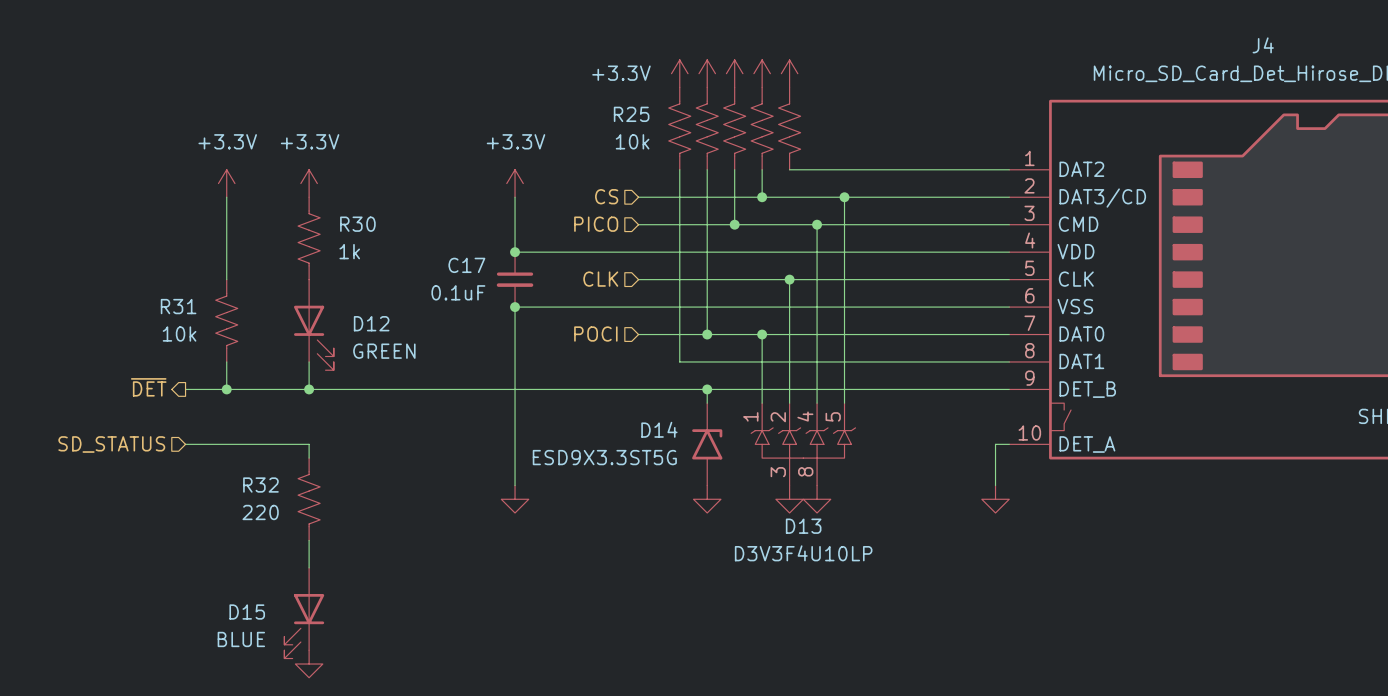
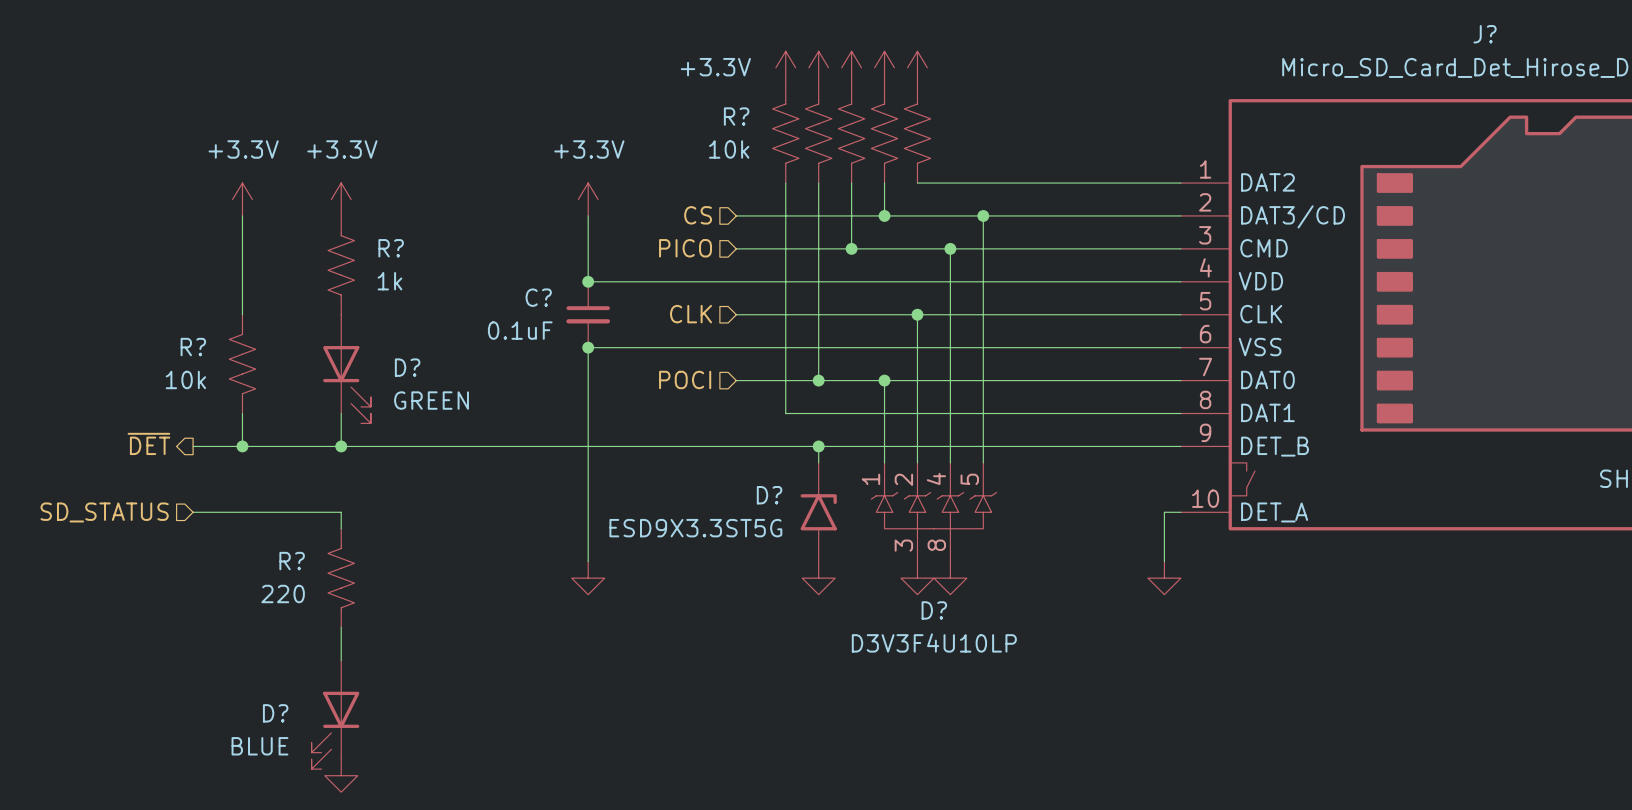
J4 name: J4 (1263, 45) -> J? (1485, 34)
R25 name: R25 (631, 114) -> R? (736, 116)
R30 name: R30 (357, 224) -> R? (391, 248)
C17 name: C17 (466, 265) -> C? (538, 297)
R31 name: R31 (178, 306) -> R? (193, 347)
D12 name: D12 (371, 323) -> D? (407, 367)
D14 name: D14 (659, 429) -> D? (769, 495)
R32 name: R32 (260, 485) -> R? (292, 561)
D13 name: D13 (803, 526) -> D? (934, 610)
D15 name: D15 (247, 612) -> D? (275, 713)

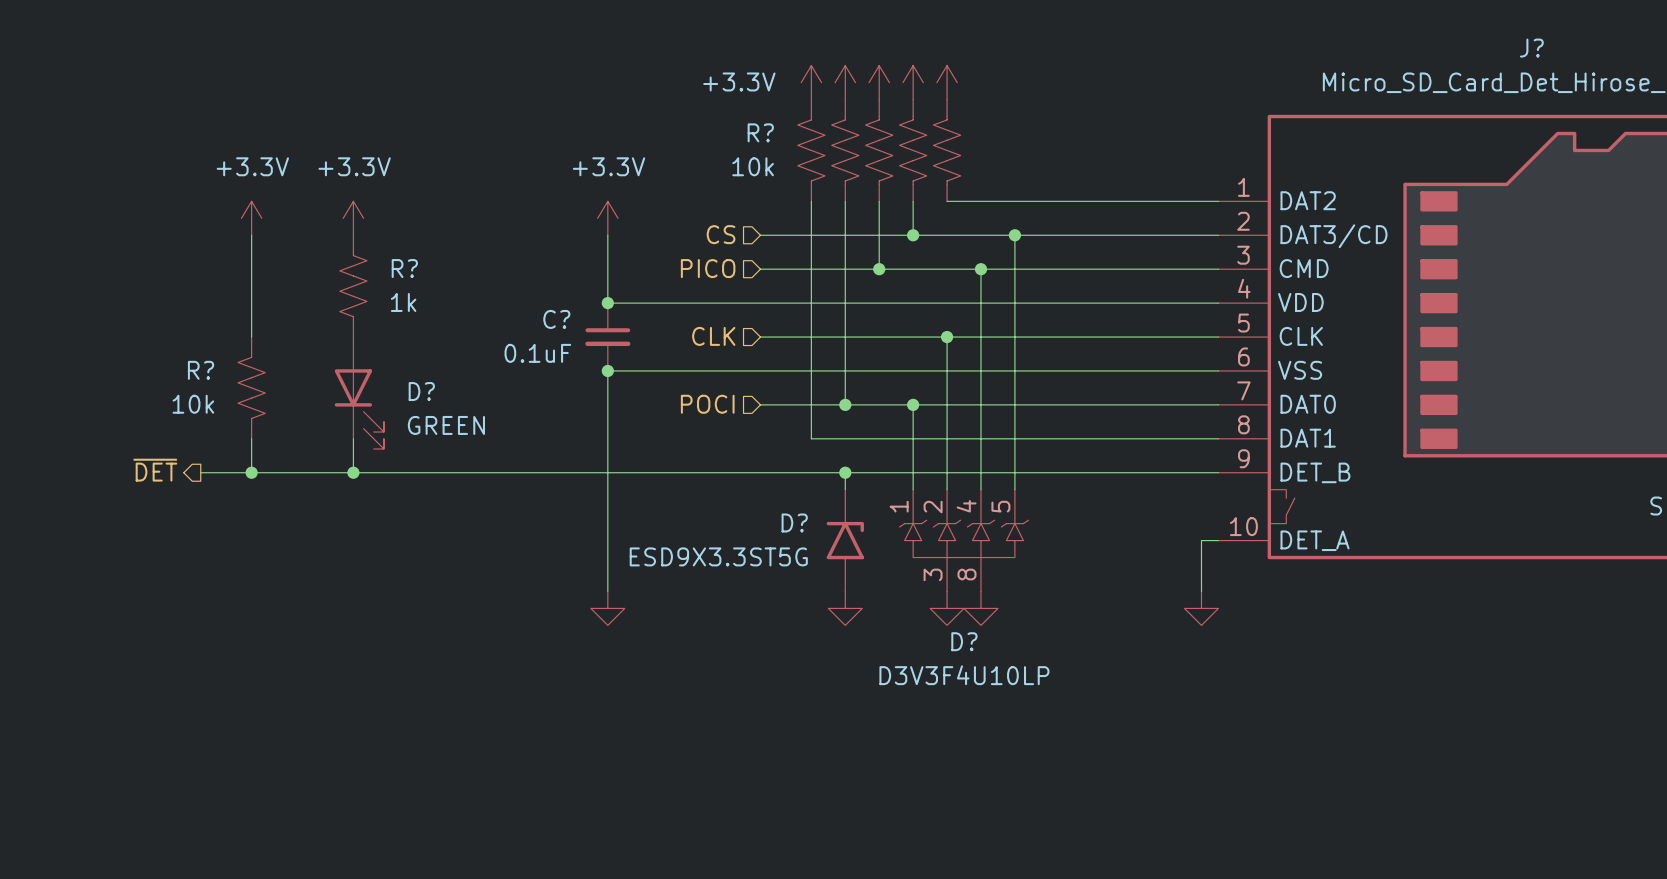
hierarchical label: SD_STATUS (104, 512) -> none
wire: (193, 512) (341, 512) (341, 528) -> none
R?: 220 (341, 578) -> none
wire: (341, 627) (341, 660) -> none
D?: BLUE (335, 714) -> none
power symbol: (341, 775) -> none

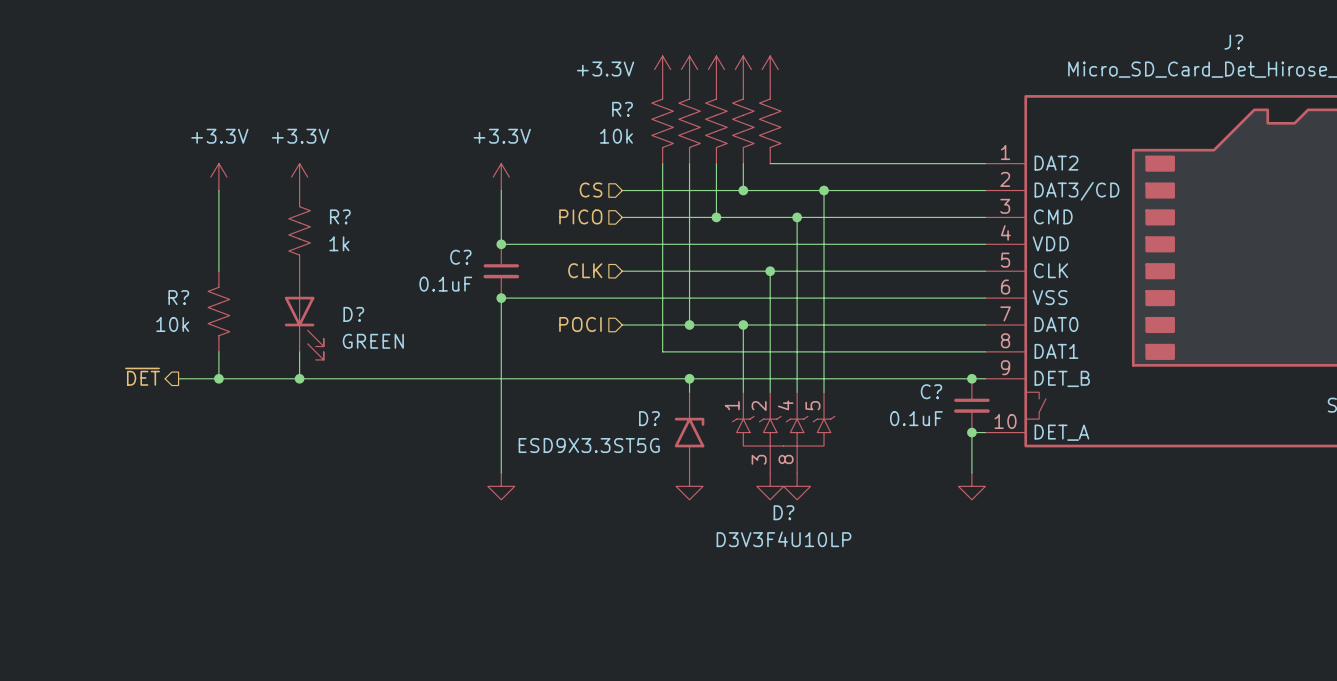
junction: none -> (971, 378)
C?: none -> 0.1uF (971, 405)
junction: none -> (971, 432)

